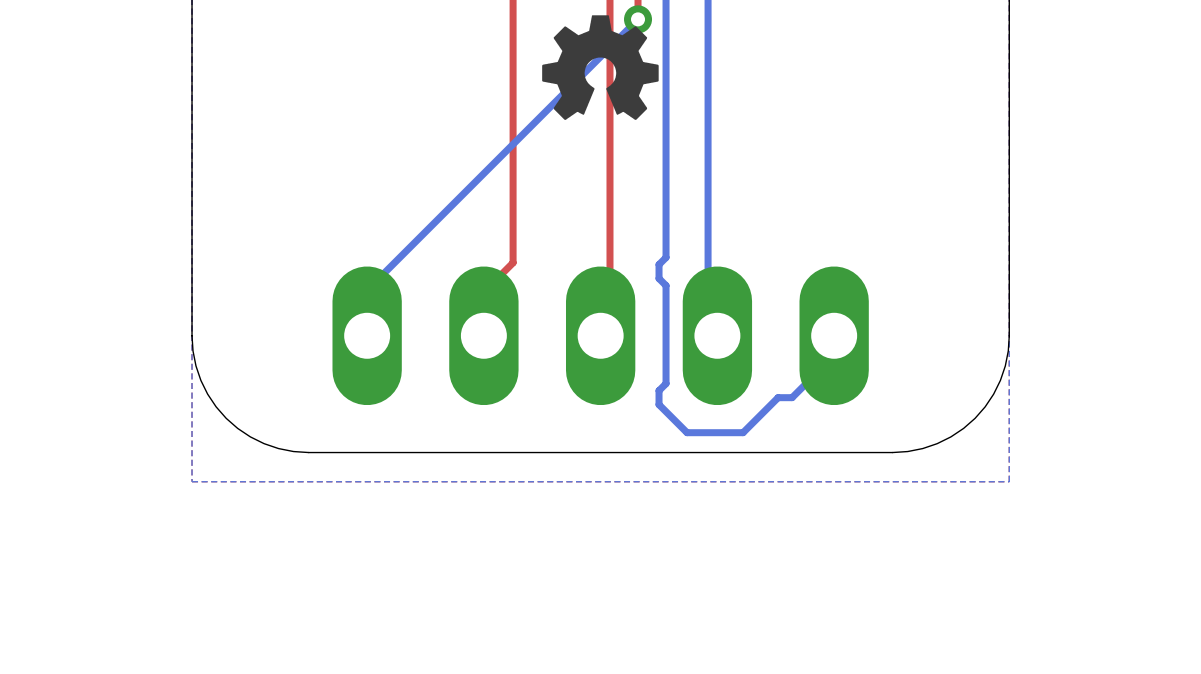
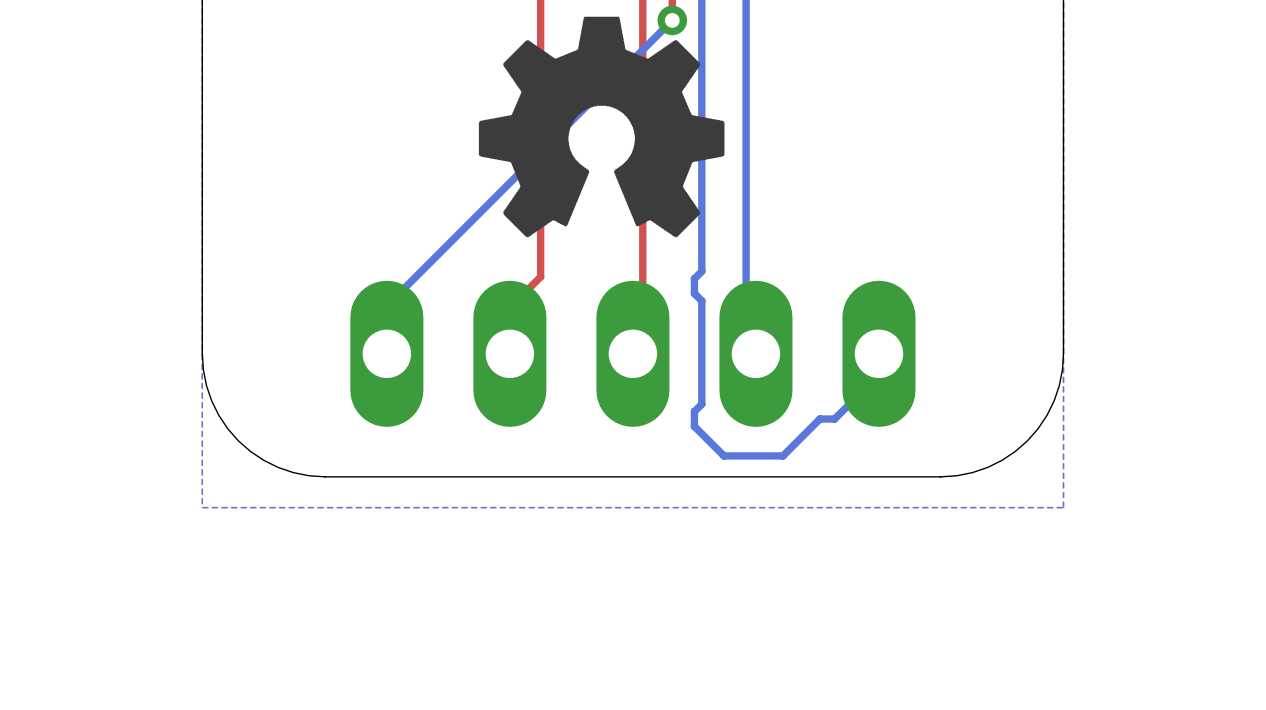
drawing: none -> [478, 16, 725, 238]
drawing: [542, 15, 659, 120] -> none

